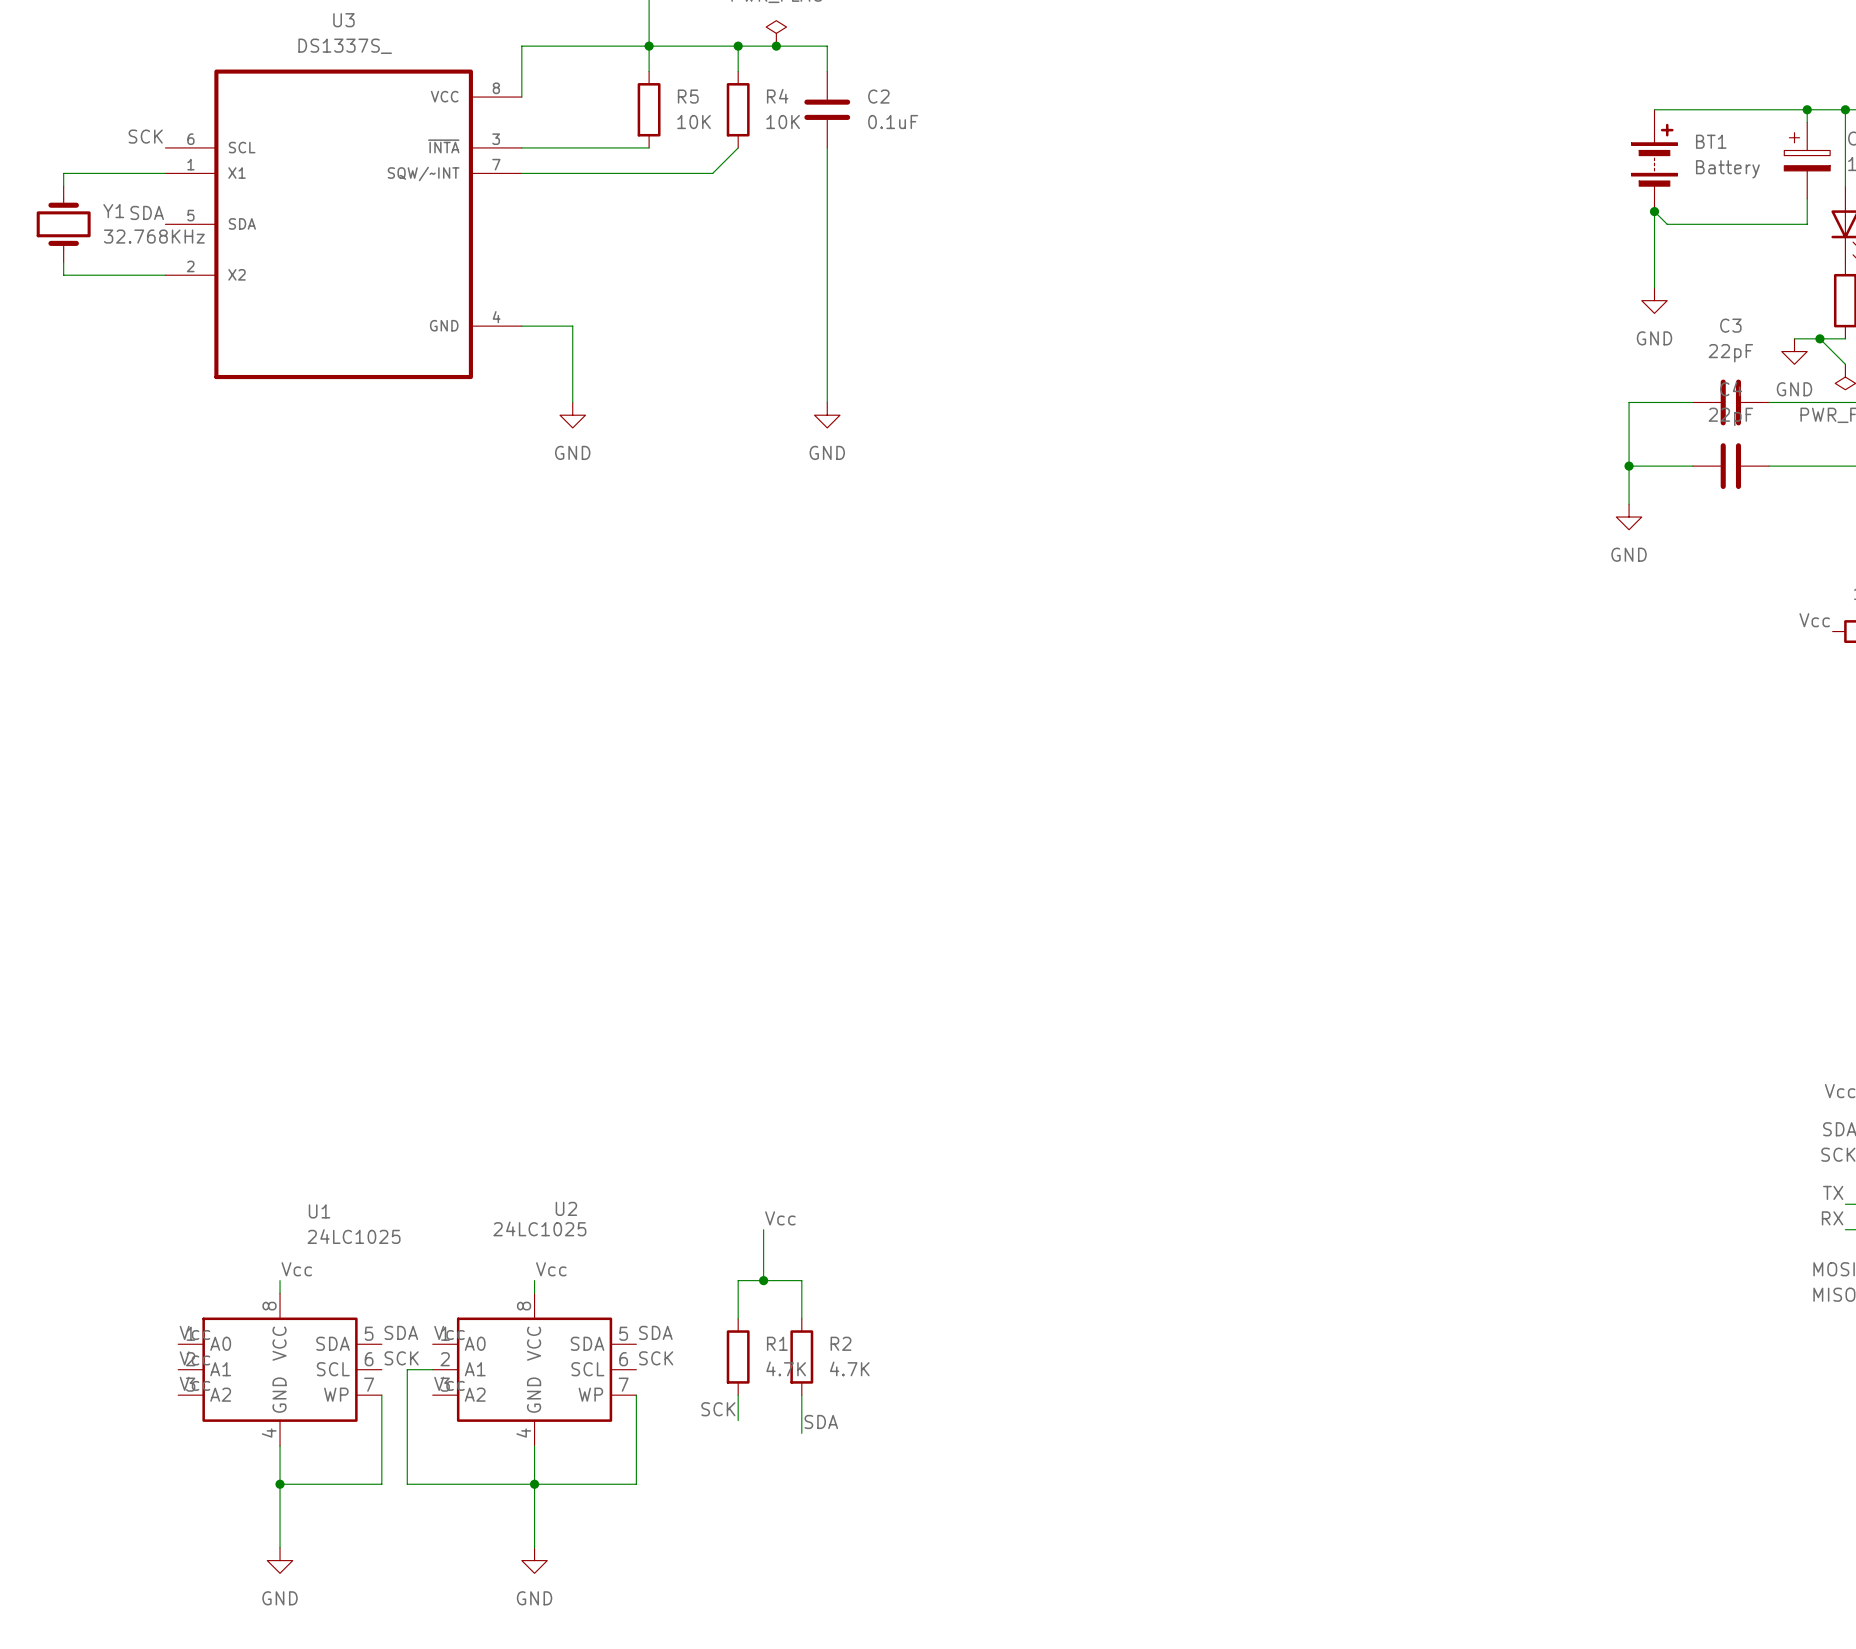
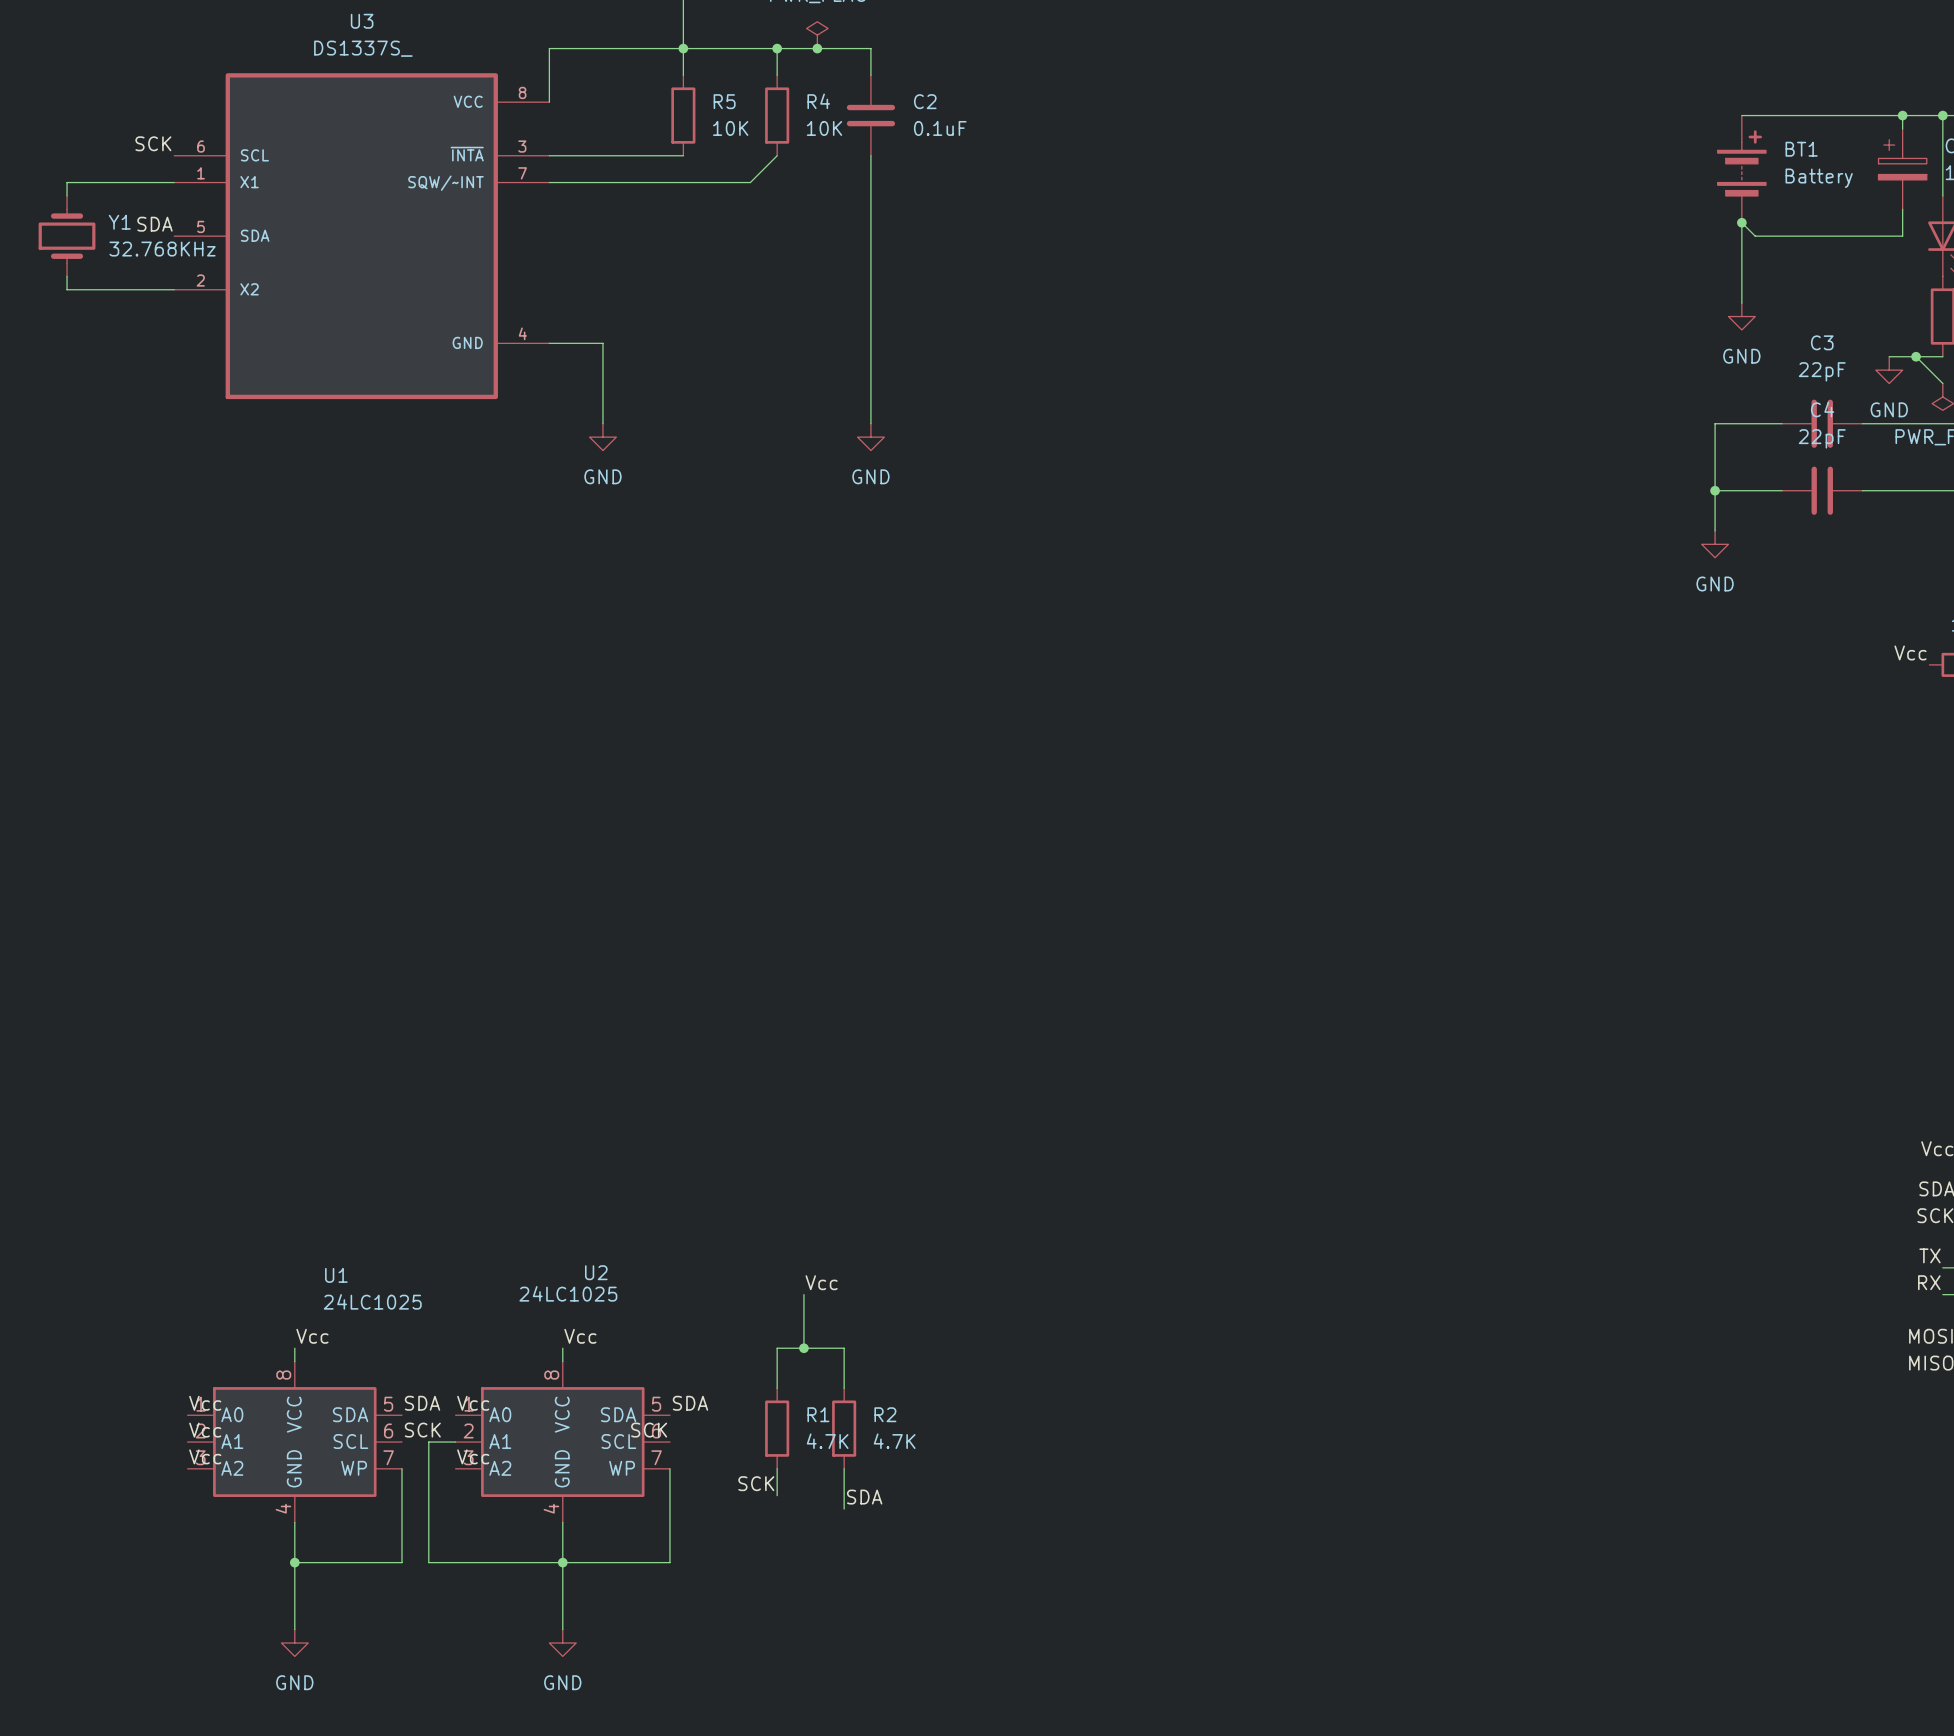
label position: SCK (656, 1358) -> SCK (649, 1430)

